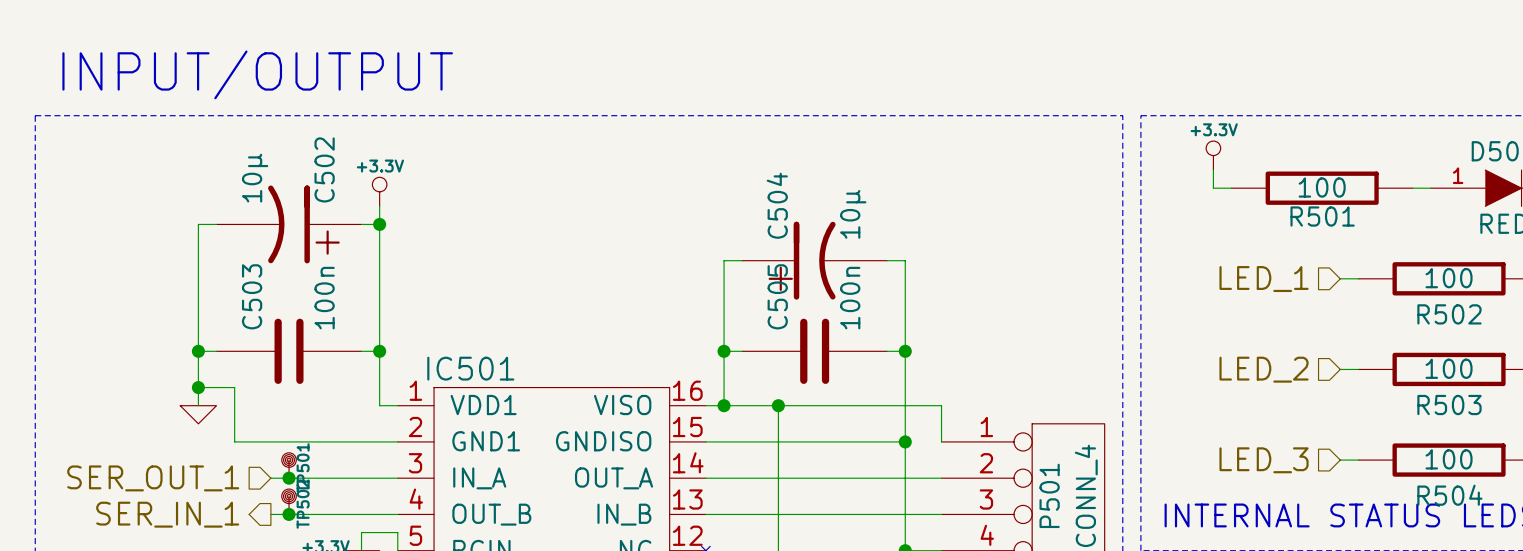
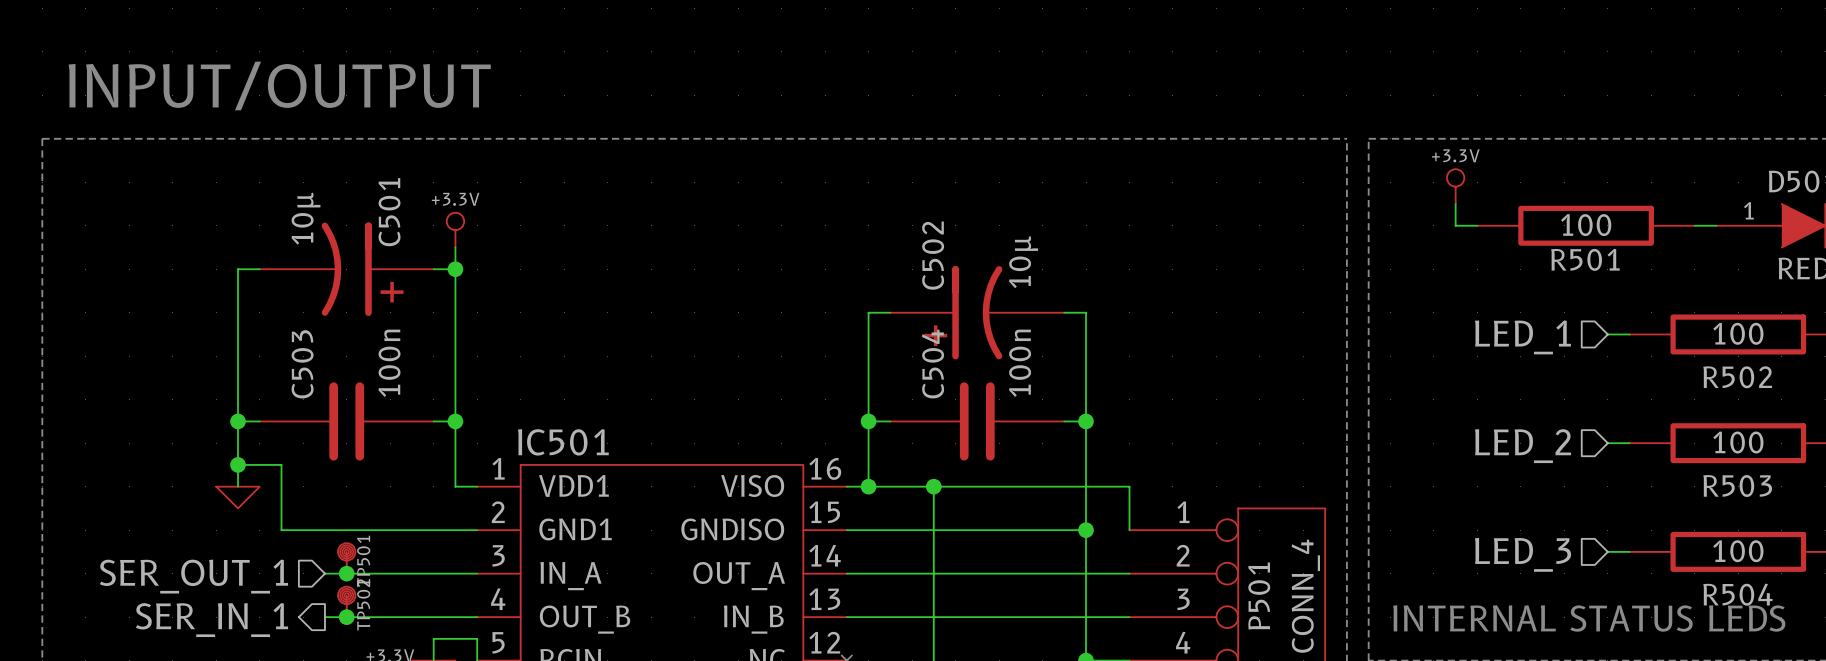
C502 name: C502 (324, 169) -> C501 (389, 212)
C504 name: C504 (777, 205) -> C502 (933, 255)
C505 name: C505 (777, 296) -> C504 (933, 364)

